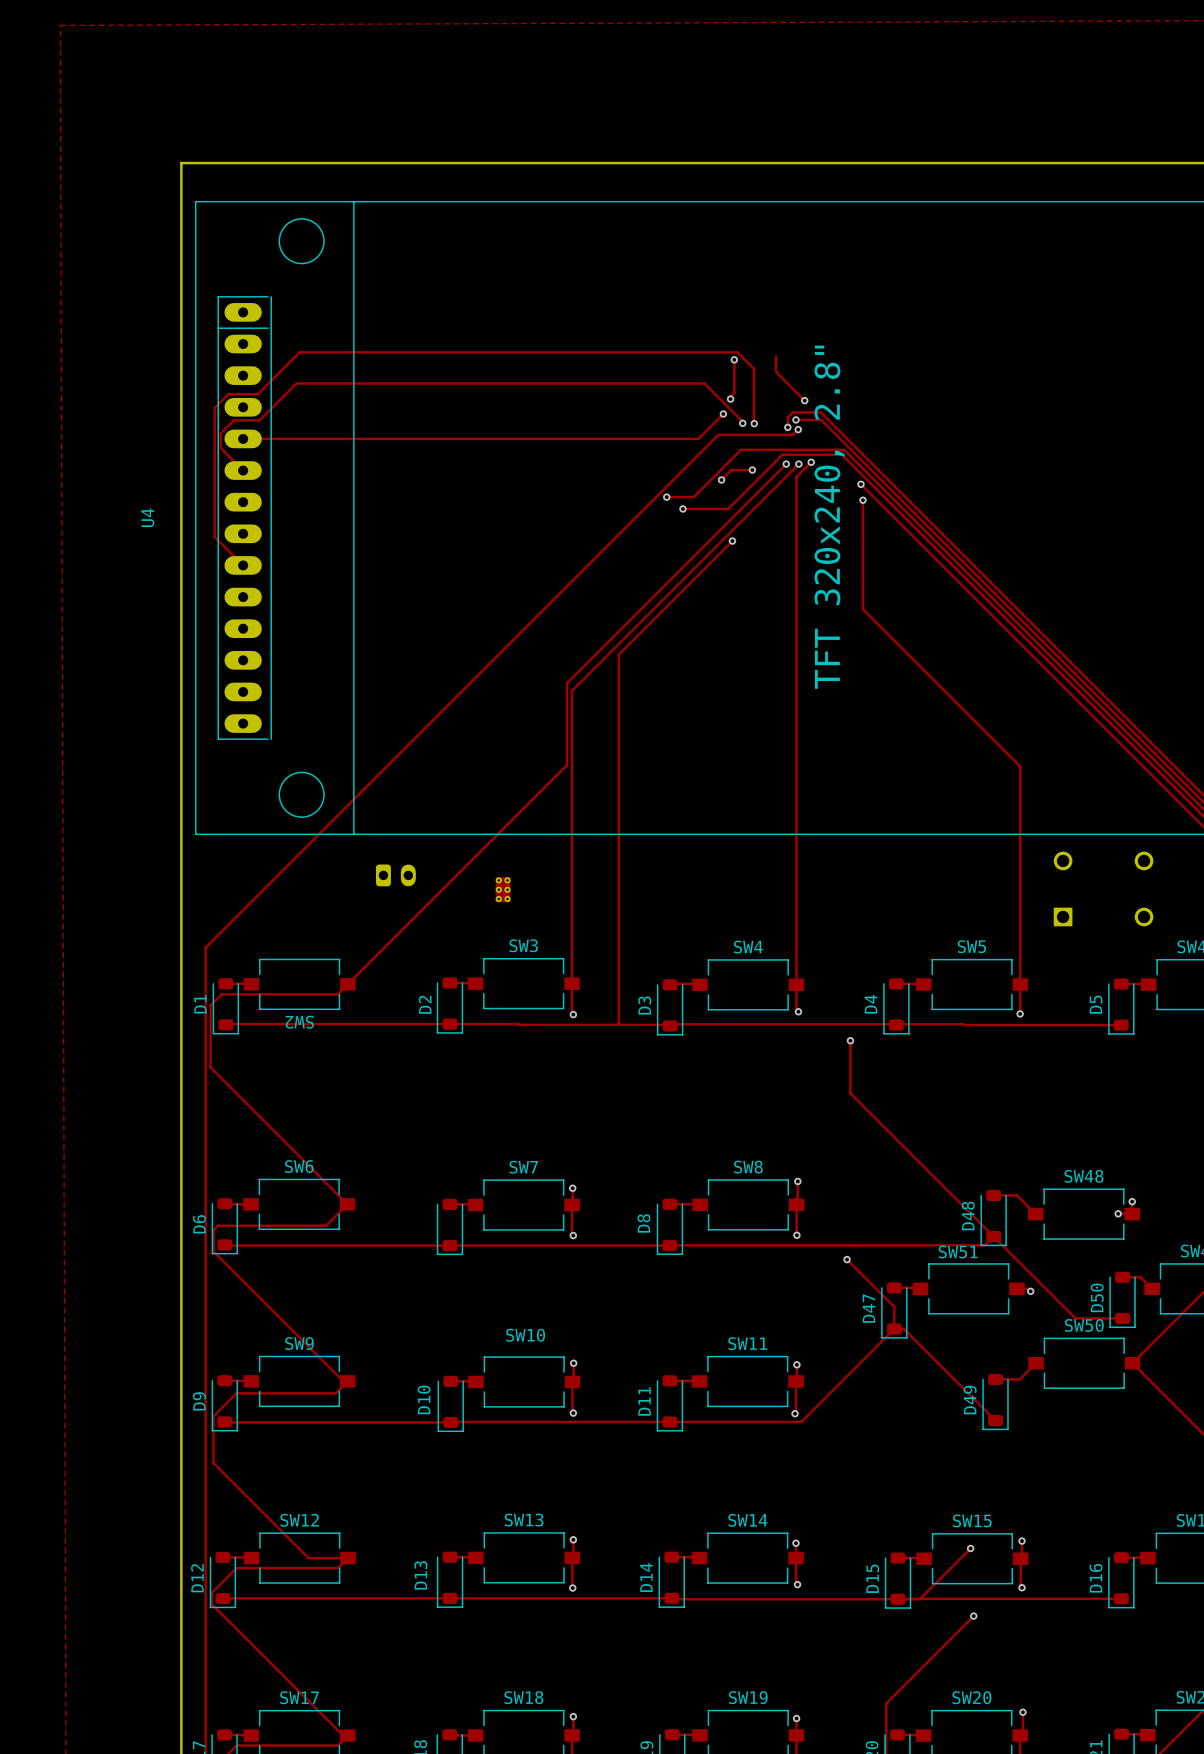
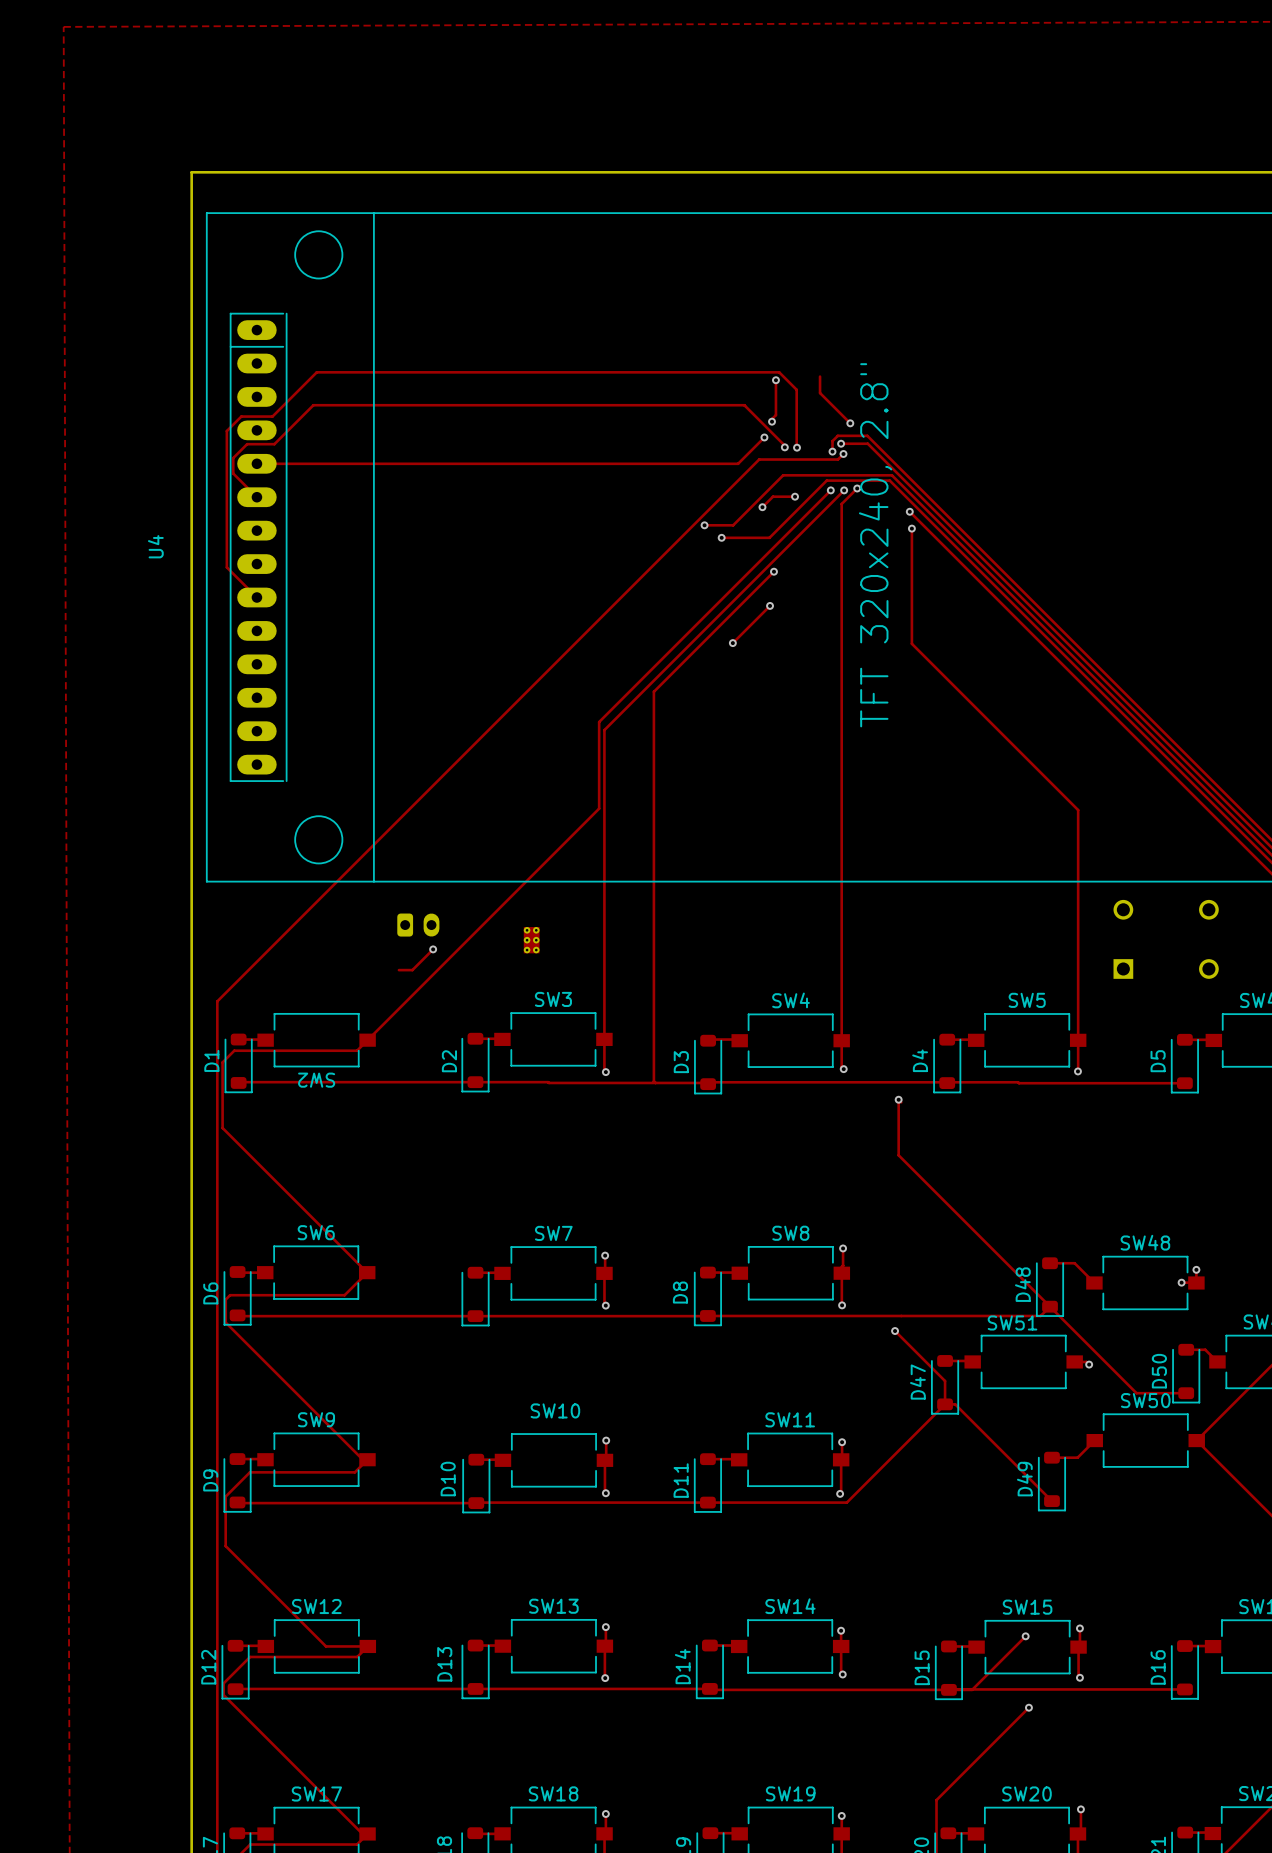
track: none -> (770, 605) (732, 643)
via: none -> (770, 605)
via: none -> (732, 643)
track: none -> (433, 949) (412, 970) (398, 970)
via: none -> (433, 949)

